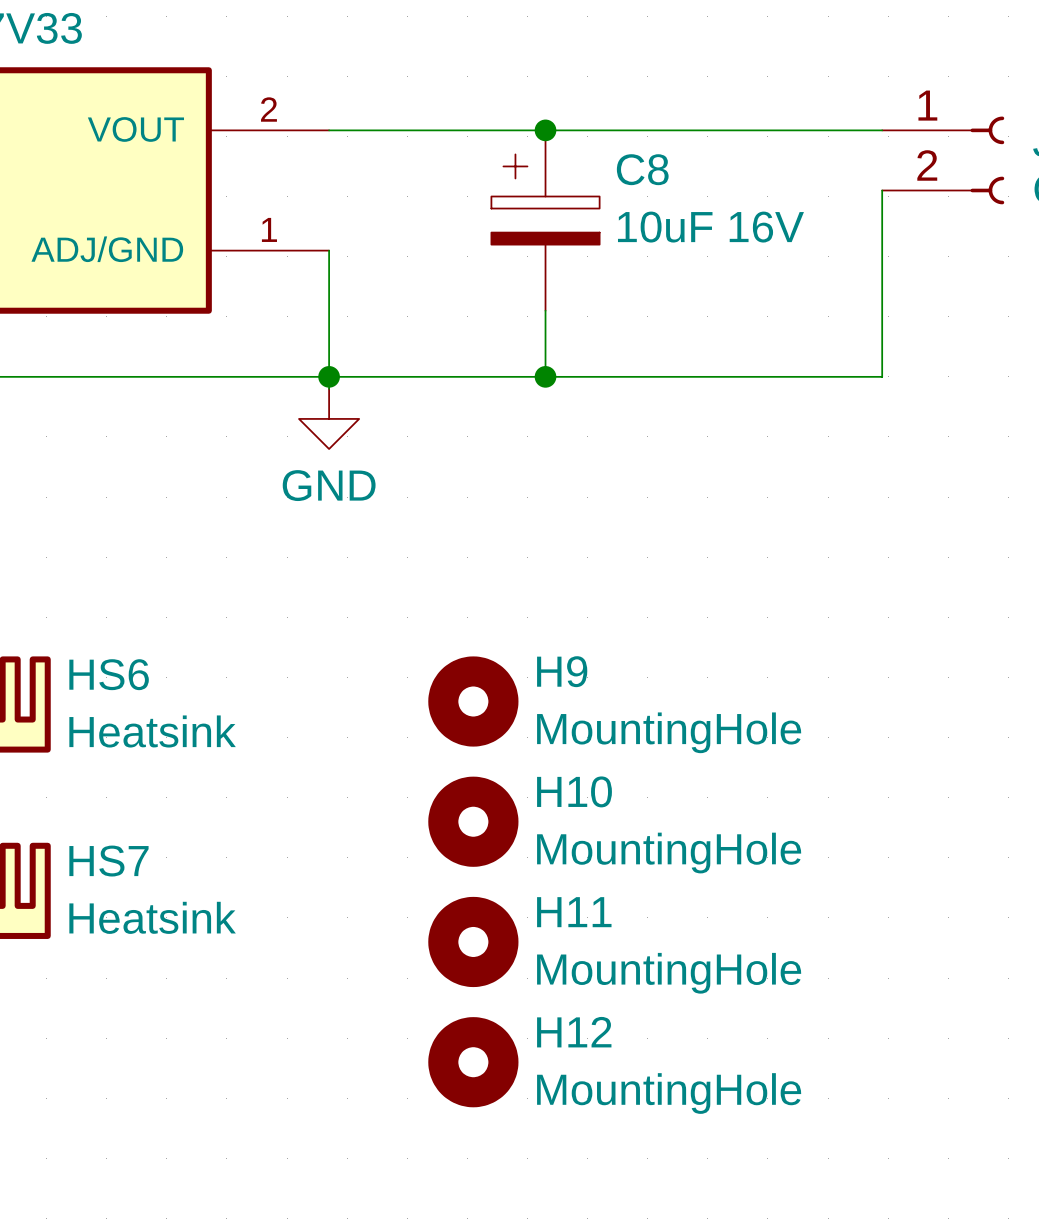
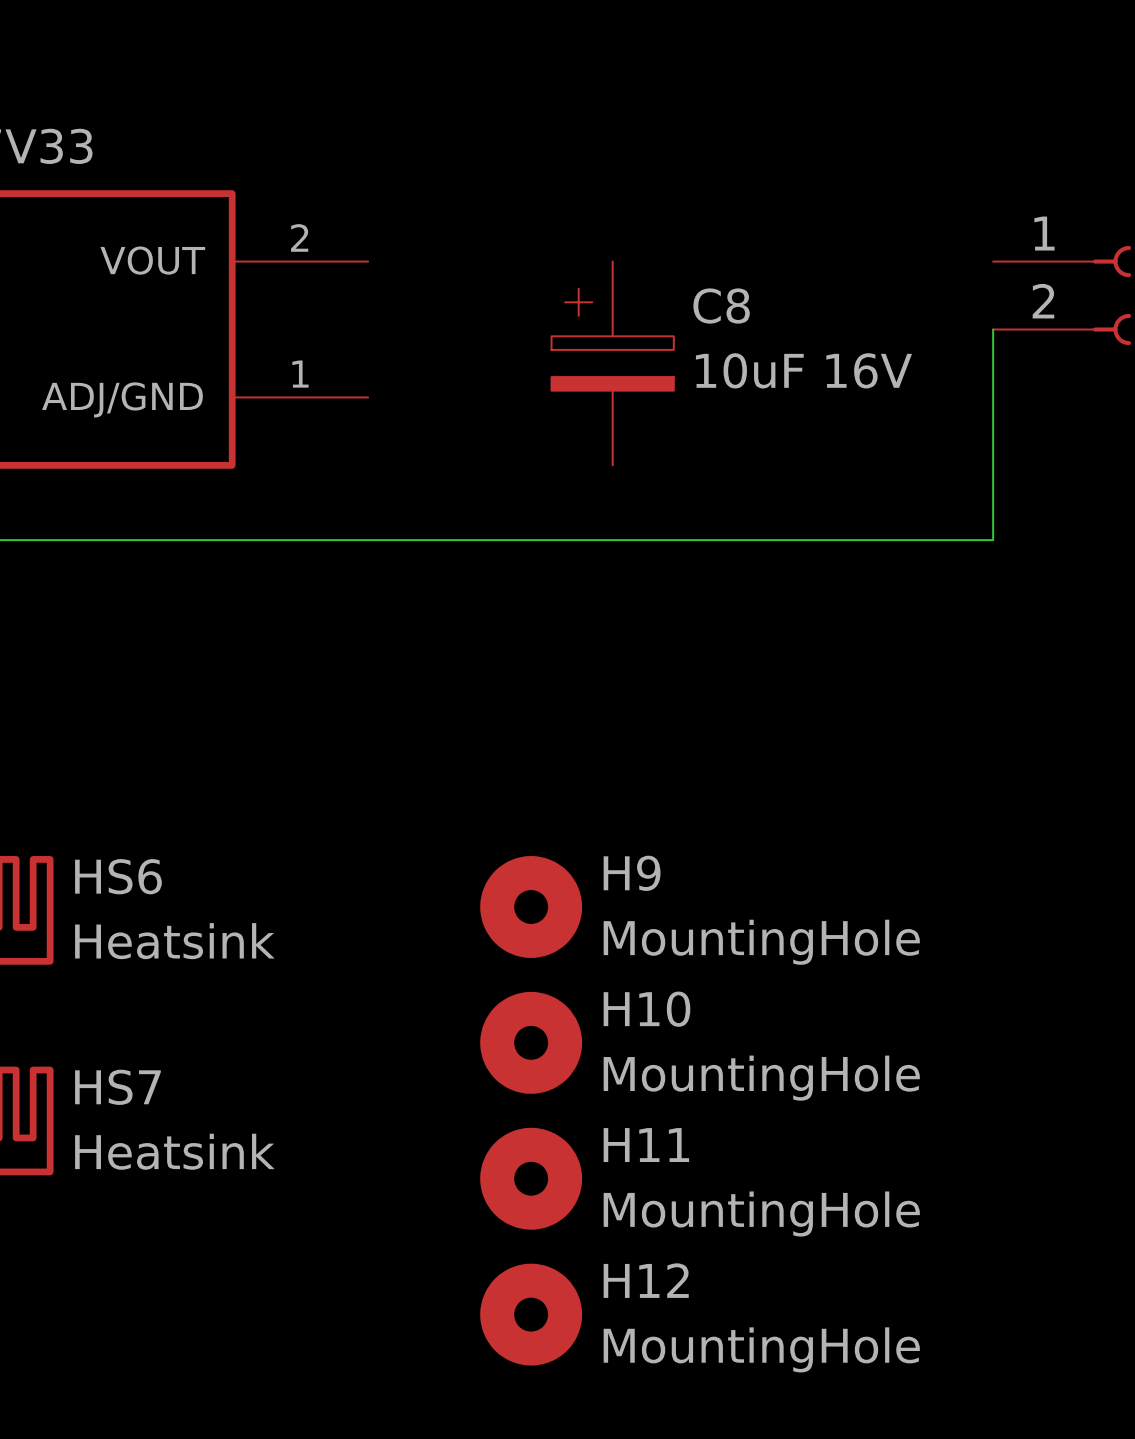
wire: (329, 130) (882, 130) -> none
junction: (545, 130) -> none
wire: (329, 250) (329, 388) -> none
wire: (545, 310) (545, 376) -> none
junction: (329, 376) -> none
junction: (545, 376) -> none
power symbol: GND (329, 418) -> none

